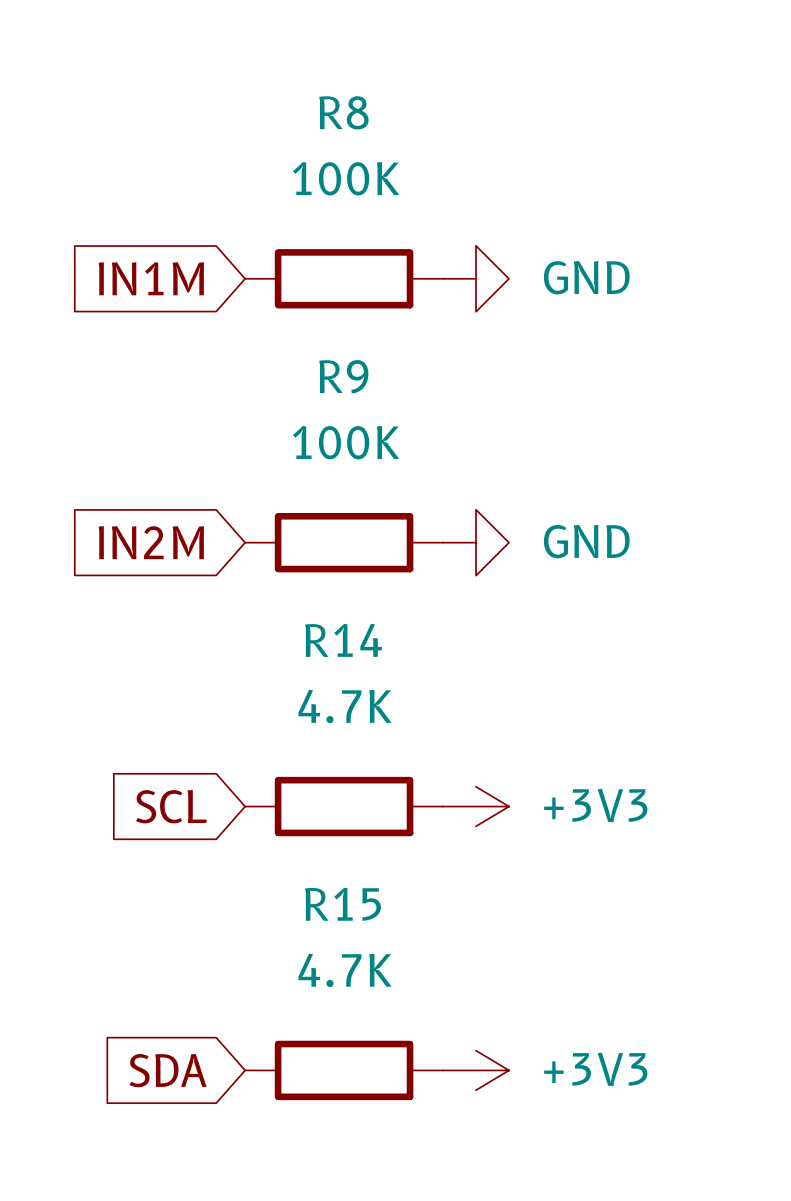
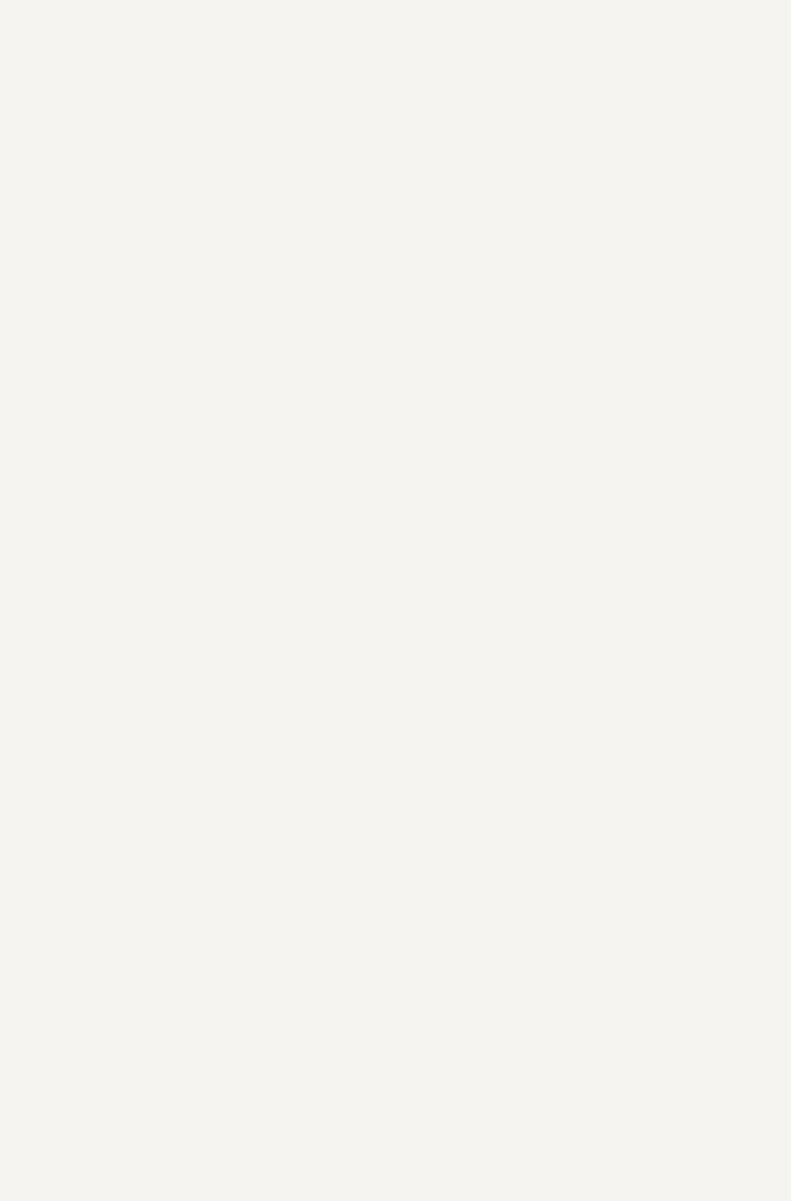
global label: IN1M (151, 278) -> none
R8: 100K (344, 278) -> none
power symbol: GND (476, 278) -> none
global label: IN2M (151, 542) -> none
R9: 100K (344, 542) -> none
power symbol: GND (476, 542) -> none
global label: SCL (171, 806) -> none
R14: 4.7K (344, 806) -> none
power symbol: +3V3 (476, 806) -> none
global label: SDA (168, 1070) -> none
R15: 4.7K (344, 1070) -> none
power symbol: +3V3 (476, 1070) -> none

